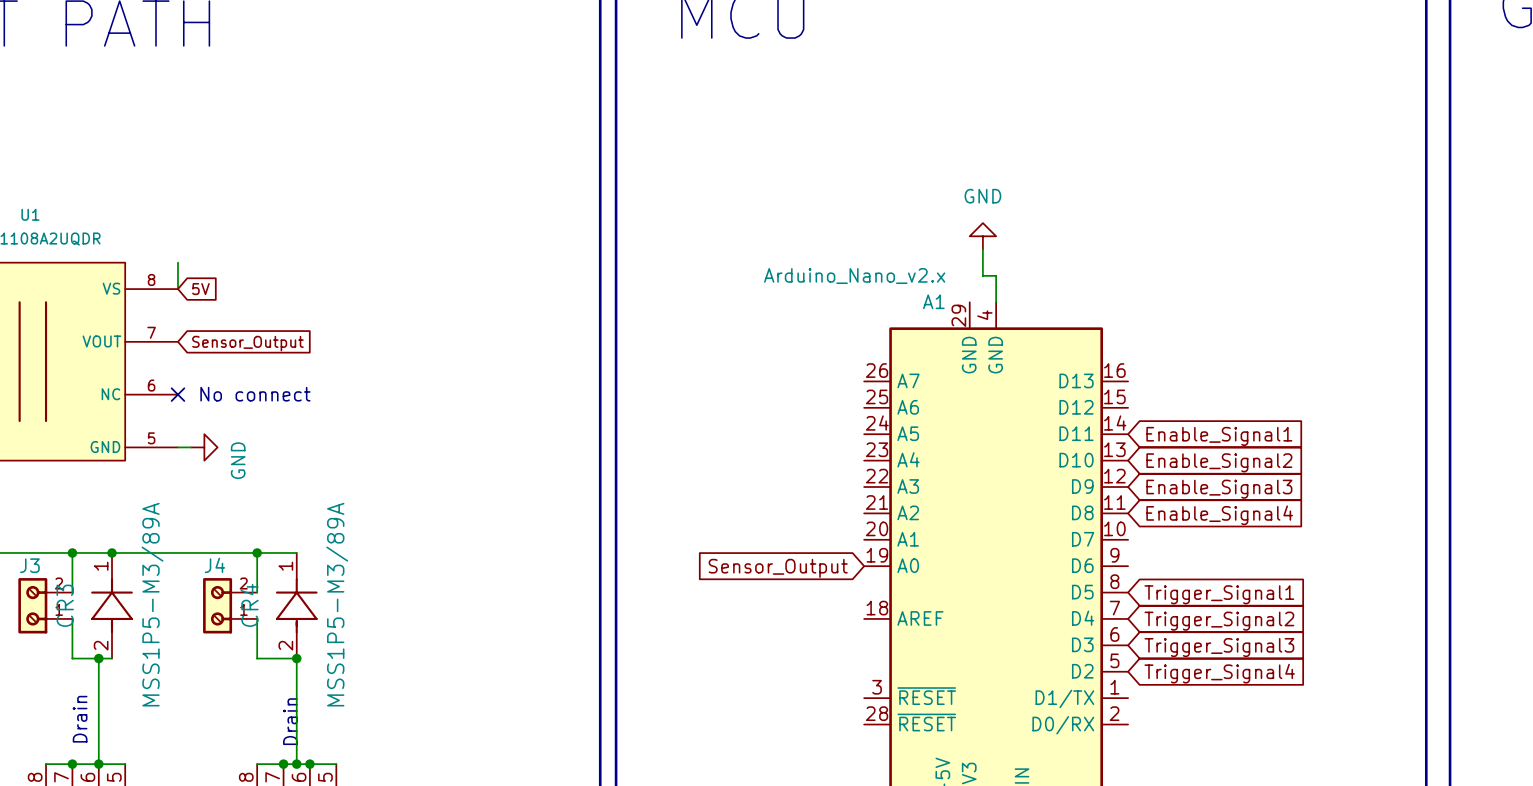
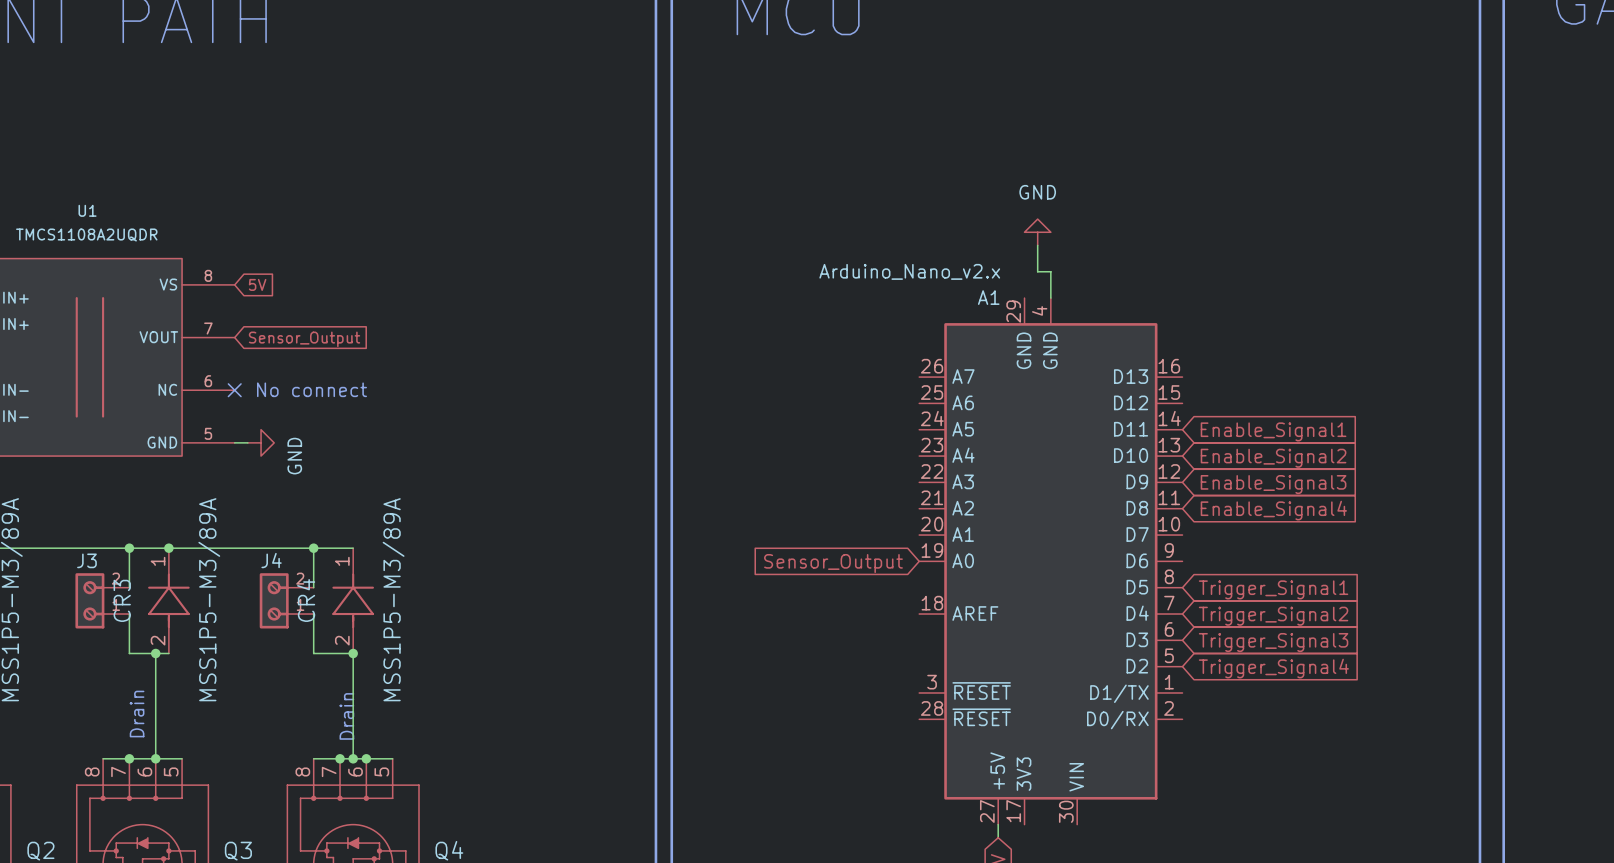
wire: (177, 262) (177, 289) -> none

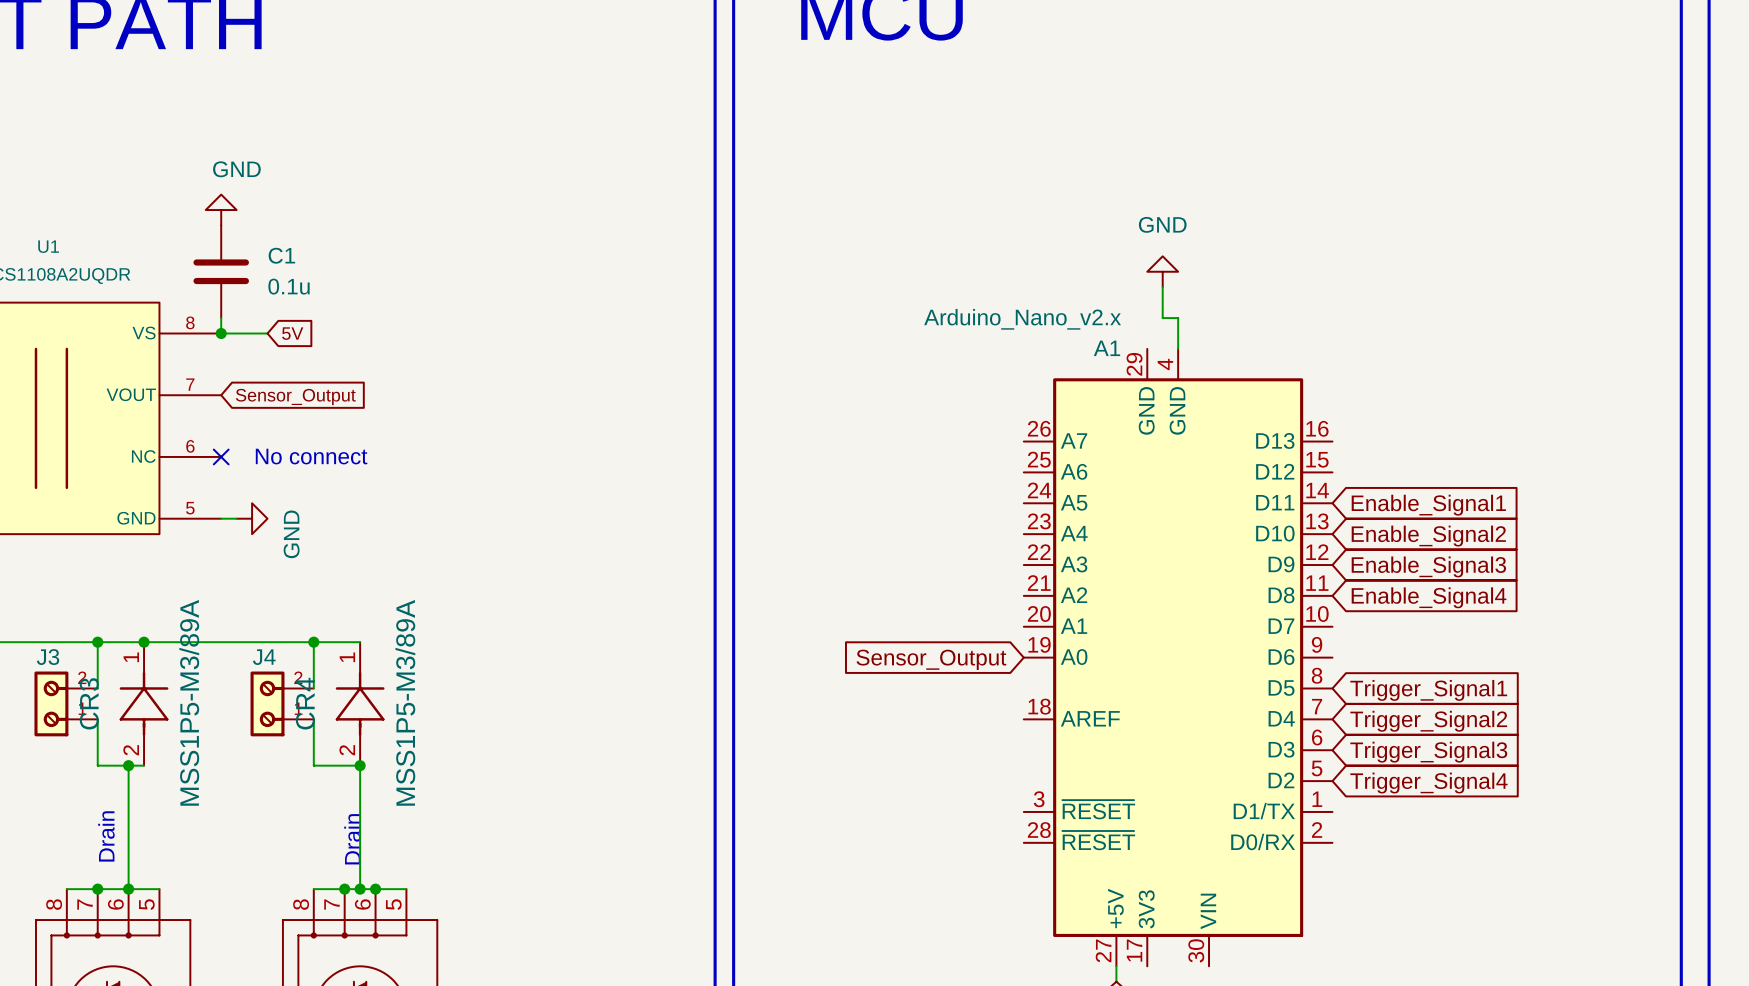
power symbol: none -> GND (221, 210)
C1: none -> 0.1u (221, 271)
wire: none -> (221, 318) (221, 333) (267, 333)
junction: none -> (221, 333)
global label position: 5V (257, 284) -> 5V (292, 333)

